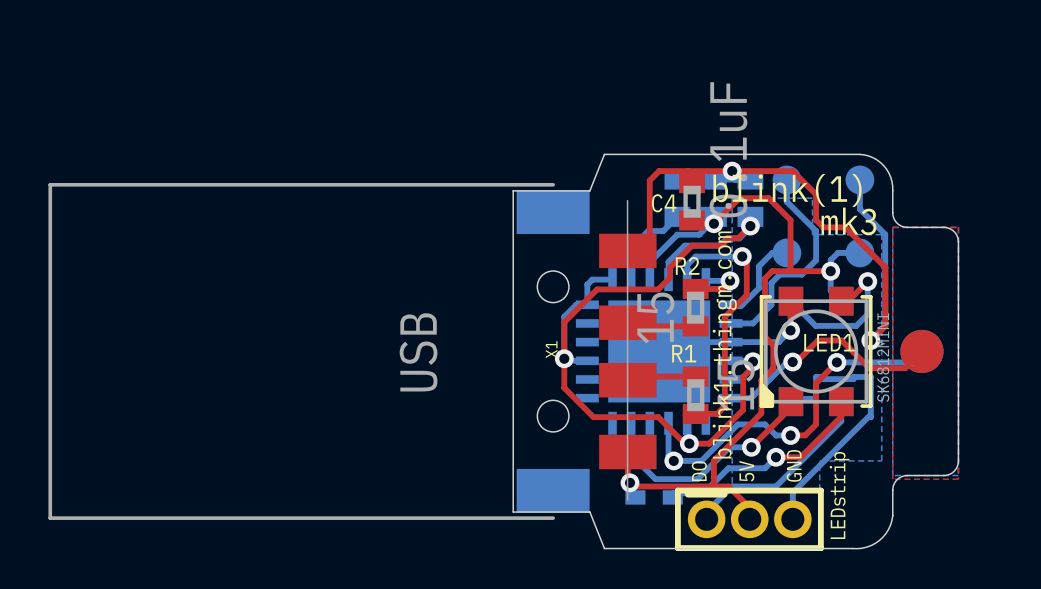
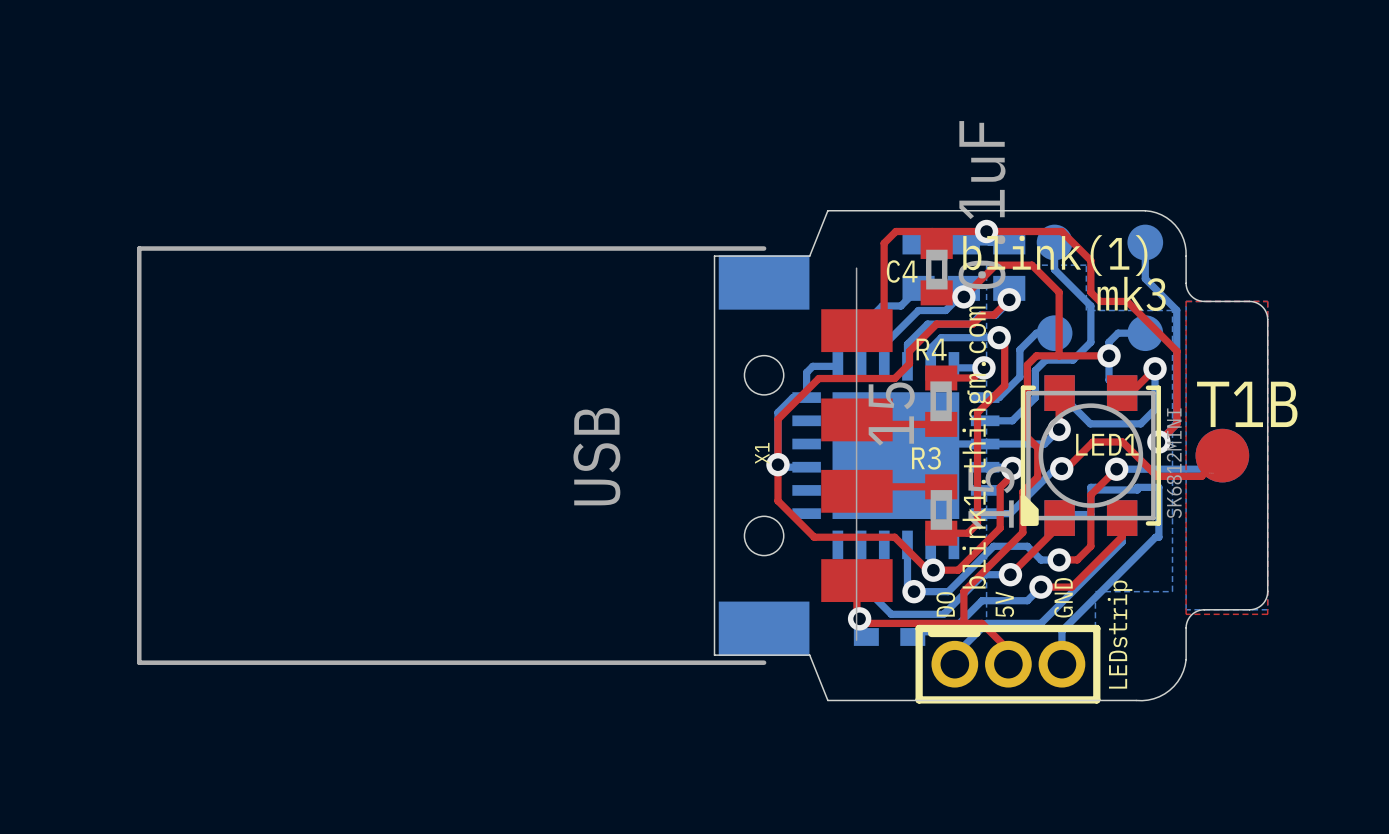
R2 name: R2 (687, 265) -> R4 (931, 349)
T1B name: none -> T1B (1247, 404)
R1 name: R1 (684, 353) -> R3 (926, 458)

